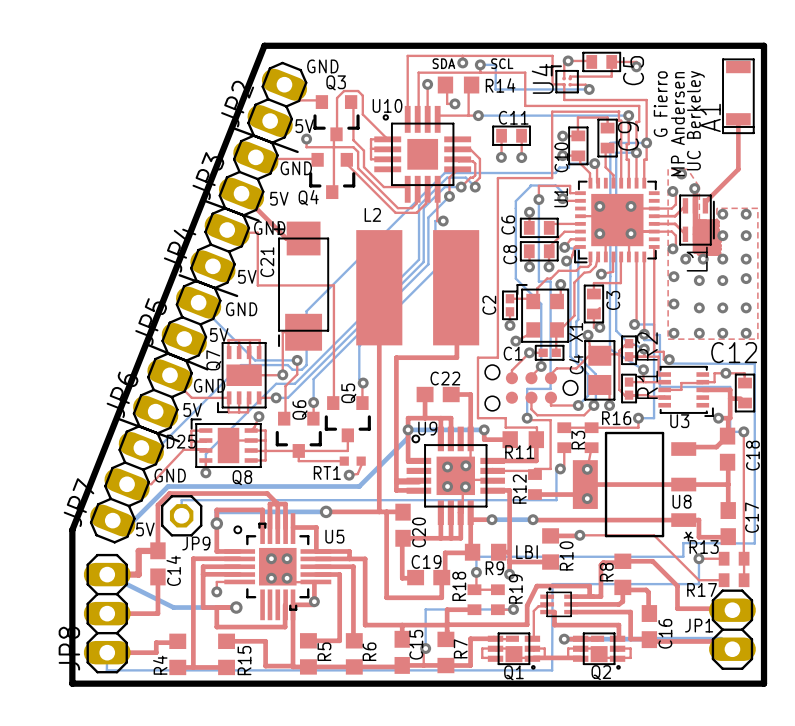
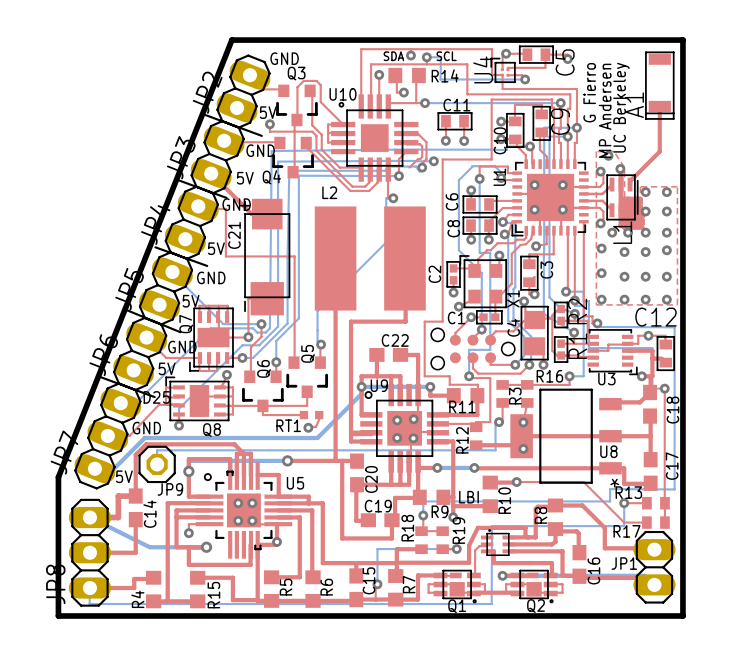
bottom track: (559, 167) (555, 173) (444, 173) (306, 311) (306, 365) -> (498, 149) (271, 151) (269, 328)
bottom track: (461, 187) (444, 187) (423, 208) (423, 262) (326, 359) -> (419, 171) (416, 166) (388, 166) (385, 170) (289, 170) (287, 323)
via position: (461, 187) -> (433, 161)
bottom track: (475, 187) (465, 177) (447, 177) (419, 205) (419, 259) (315, 363) -> (433, 161) (278, 161) (278, 326)
bottom track: (449, 196) (428, 217) (428, 264) (338, 354) -> (398, 176) (298, 175) (298, 318)

